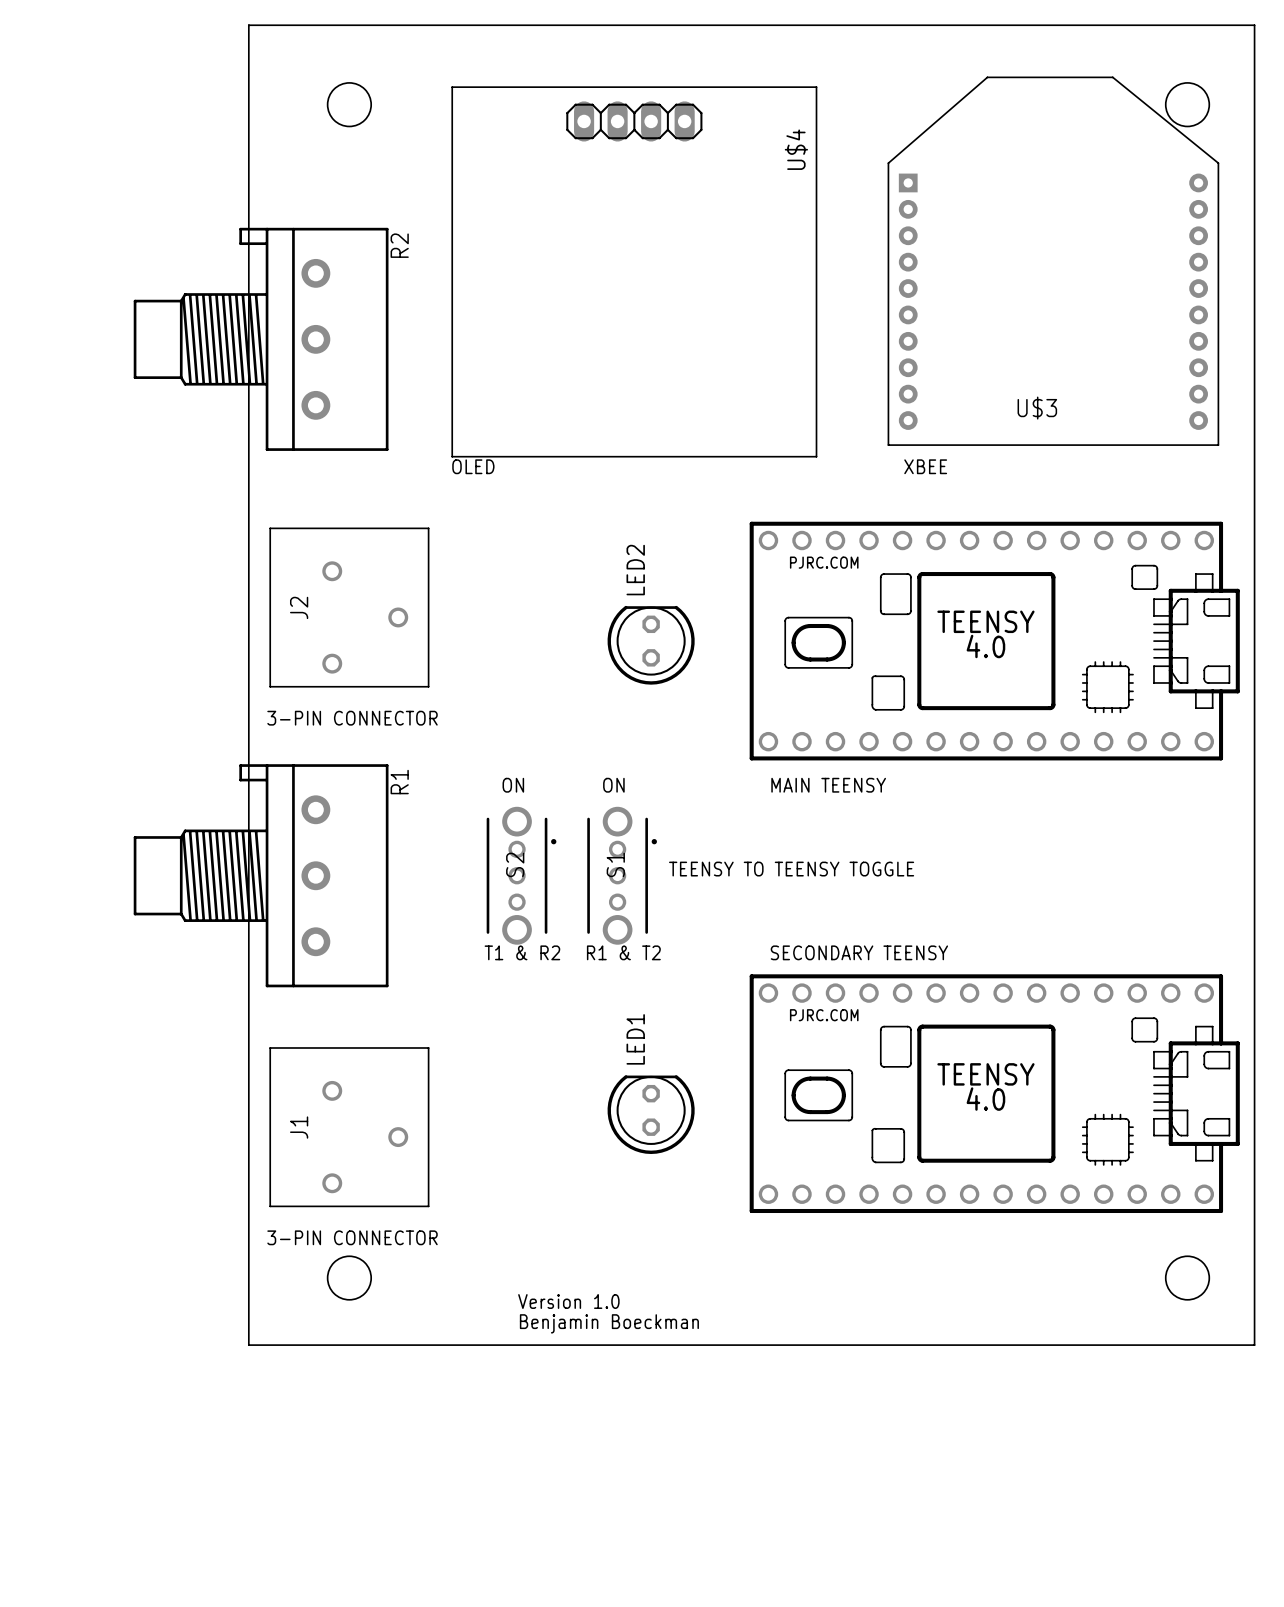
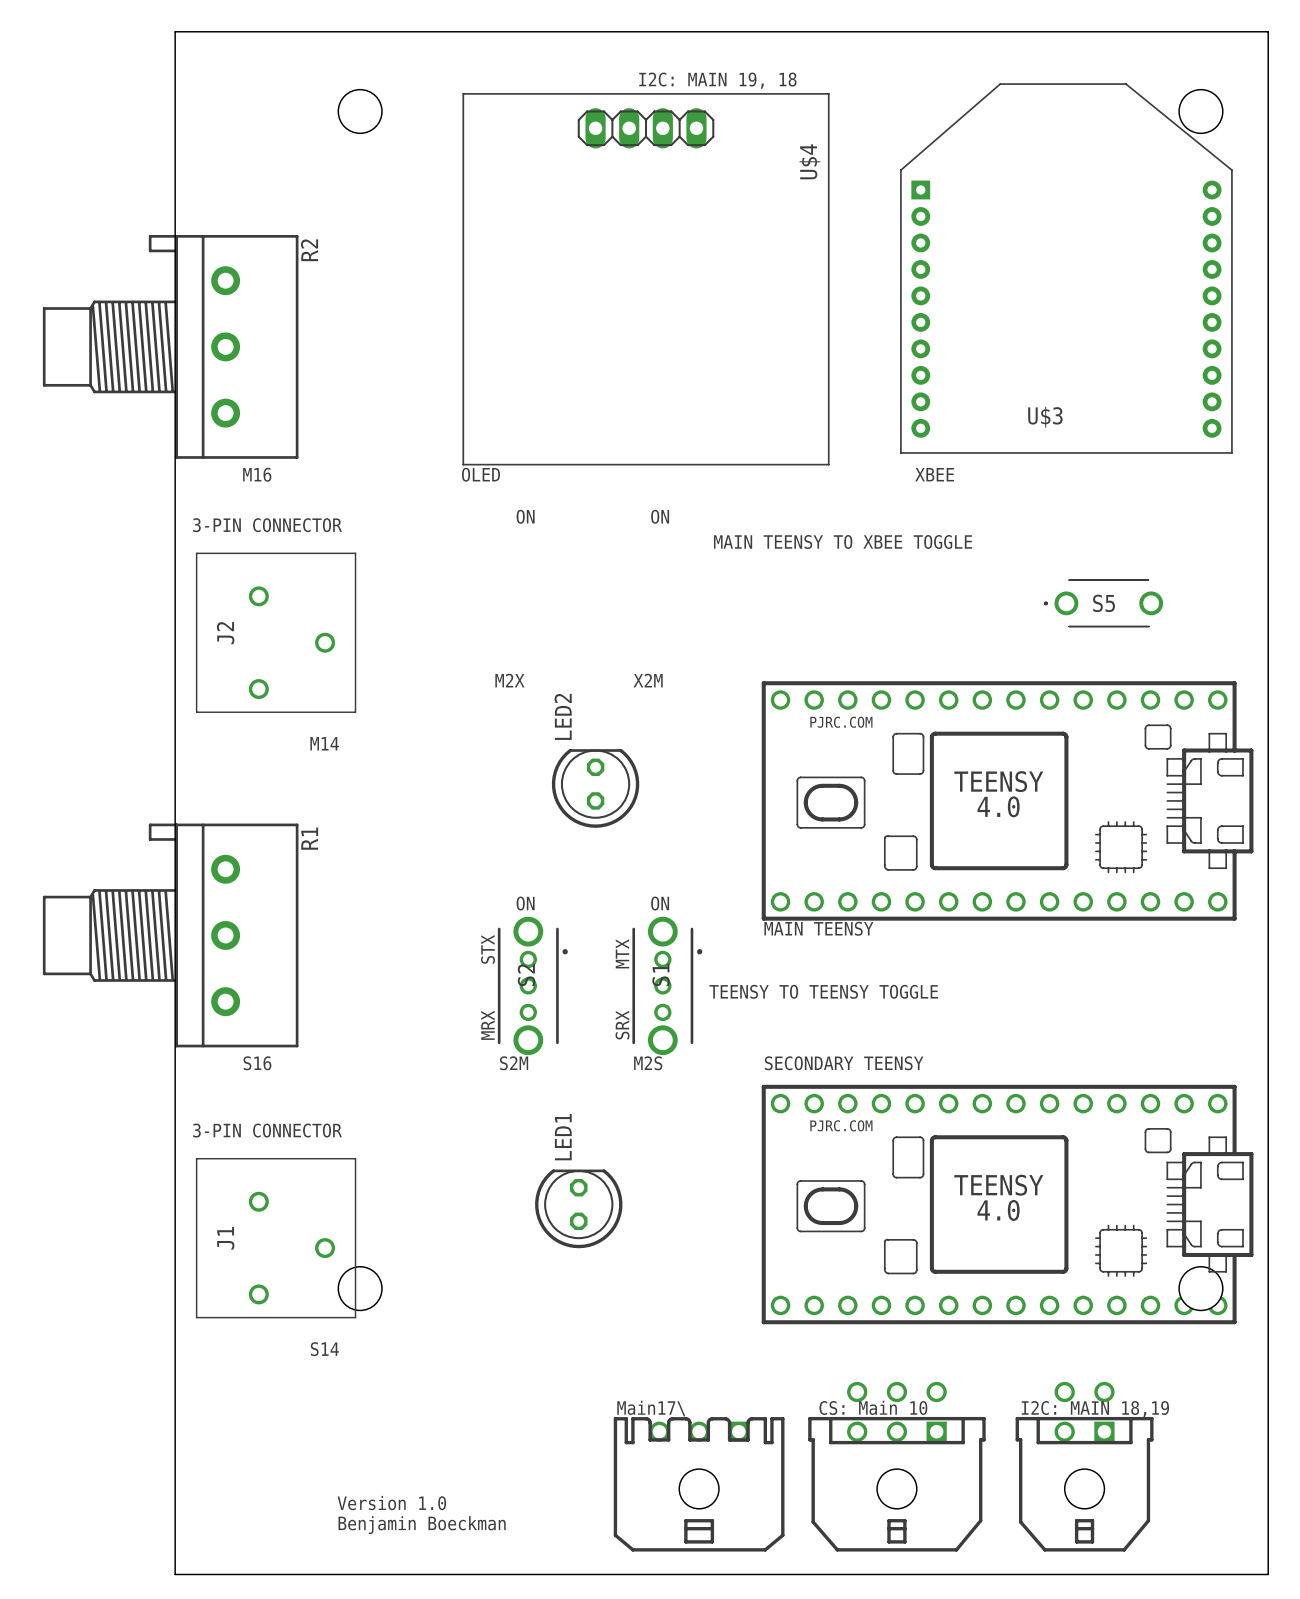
board edge: (248, 25) (248, 1345) (1254, 1345) -> (259, 31) (175, 31) (175, 1574) (1268, 1574) (1268, 1355)
text: none -> I2C: MAIN 19, 18 (717, 80)
R2 position: (261, 339) -> (170, 346)
text: none -> M16 (257, 474)
text: none -> ON (525, 516)
text: none -> ON (660, 516)
text: none -> 3-PIN CONNECTOR (267, 525)
text: none -> MAIN TEENSY TO XBEE TOGGLE (843, 541)
LED2 name position: LED2 (635, 570) -> LED2 (563, 716)
S5: none -> (1103, 603)
J2 position: (349, 607) -> (276, 632)
part: (994, 641) -> none
LED2 position: (651, 645) -> (595, 788)
text: none -> M2X (509, 680)
text: none -> X2M (648, 680)
text: 3-PIN CONNECTOR (352, 718) -> none
text: none -> M14 (324, 743)
text: ON (513, 785) -> none
text: ON (613, 785) -> none
text position: MAIN TEENSY (828, 785) -> MAIN TEENSY (818, 928)
part: none -> (1007, 800)
text position: TEENSY TO TEENSY TOGGLE (791, 869) -> TEENSY TO TEENSY TOGGLE (823, 991)
R1 position: (261, 875) -> (170, 935)
S2 position: (521, 875) -> (532, 985)
S1 position: (622, 875) -> (667, 985)
text: none -> ON (525, 903)
text: none -> ON (660, 903)
text: none -> MTX (622, 953)
text: T1 & R2 (522, 952) -> STX (487, 949)
text: R1 & T2 (623, 952) -> none
text position: SECONDARY TEENSY (859, 952) -> SECONDARY TEENSY (844, 1063)
text: none -> MRX (487, 1025)
text: none -> SRX (622, 1025)
text: none -> S16 (257, 1063)
text: none -> S2M (514, 1063)
text: none -> M2S (648, 1063)
part position: (994, 1093) -> (1007, 1204)
LED1 position: (651, 1114) -> (578, 1208)
J1 position: (349, 1127) -> (276, 1238)
text position: 3-PIN CONNECTOR (352, 1237) -> 3-PIN CONNECTOR (267, 1130)
text position: Version 1.0 (568, 1301) -> Version 1.0 (391, 1503)
text position: Benjamin Boeckman (609, 1323) -> Benjamin Boeckman (422, 1525)
text: none -> S14 (324, 1349)
text: none -> Main17\ (651, 1408)
text: none -> CS: Main 10 (873, 1407)
text: none -> I2C: MAIN 18,19 (1095, 1409)
part: none -> (896, 1466)
part: none -> (1084, 1466)
part: none -> (699, 1484)

